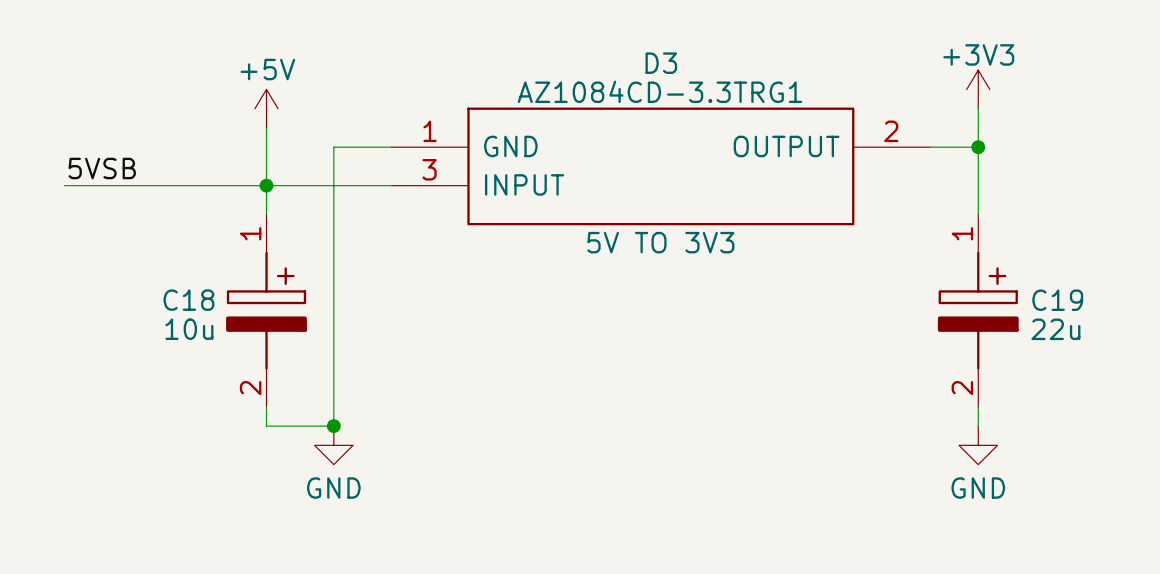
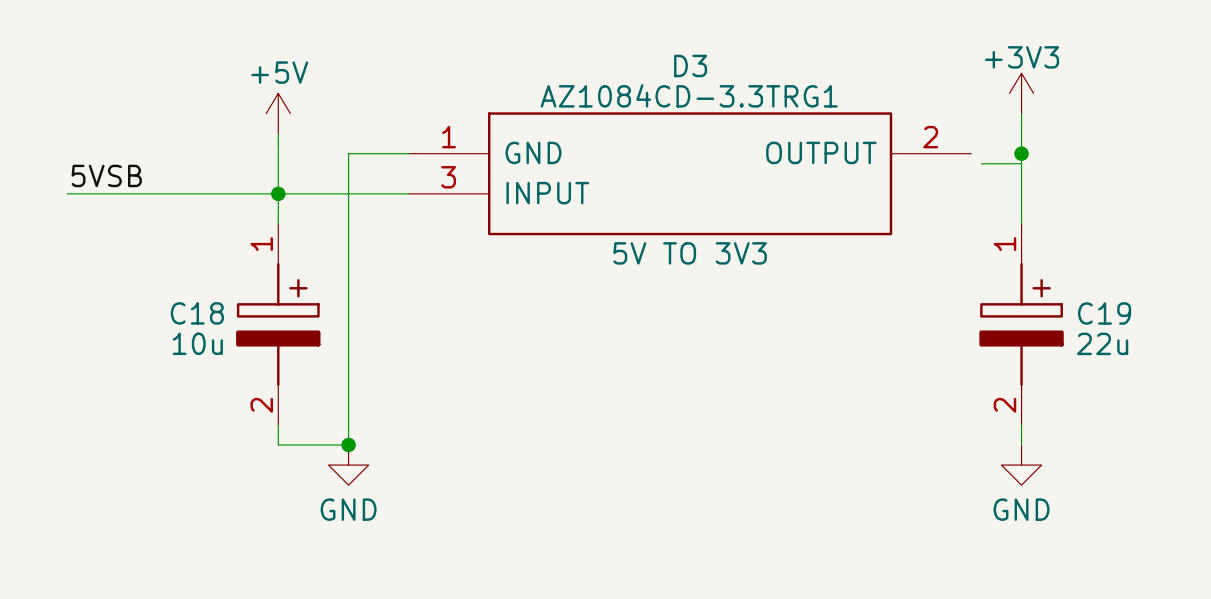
wire: (930, 147) (978, 147) -> none
wire: none -> (981, 163) (1021, 163)

